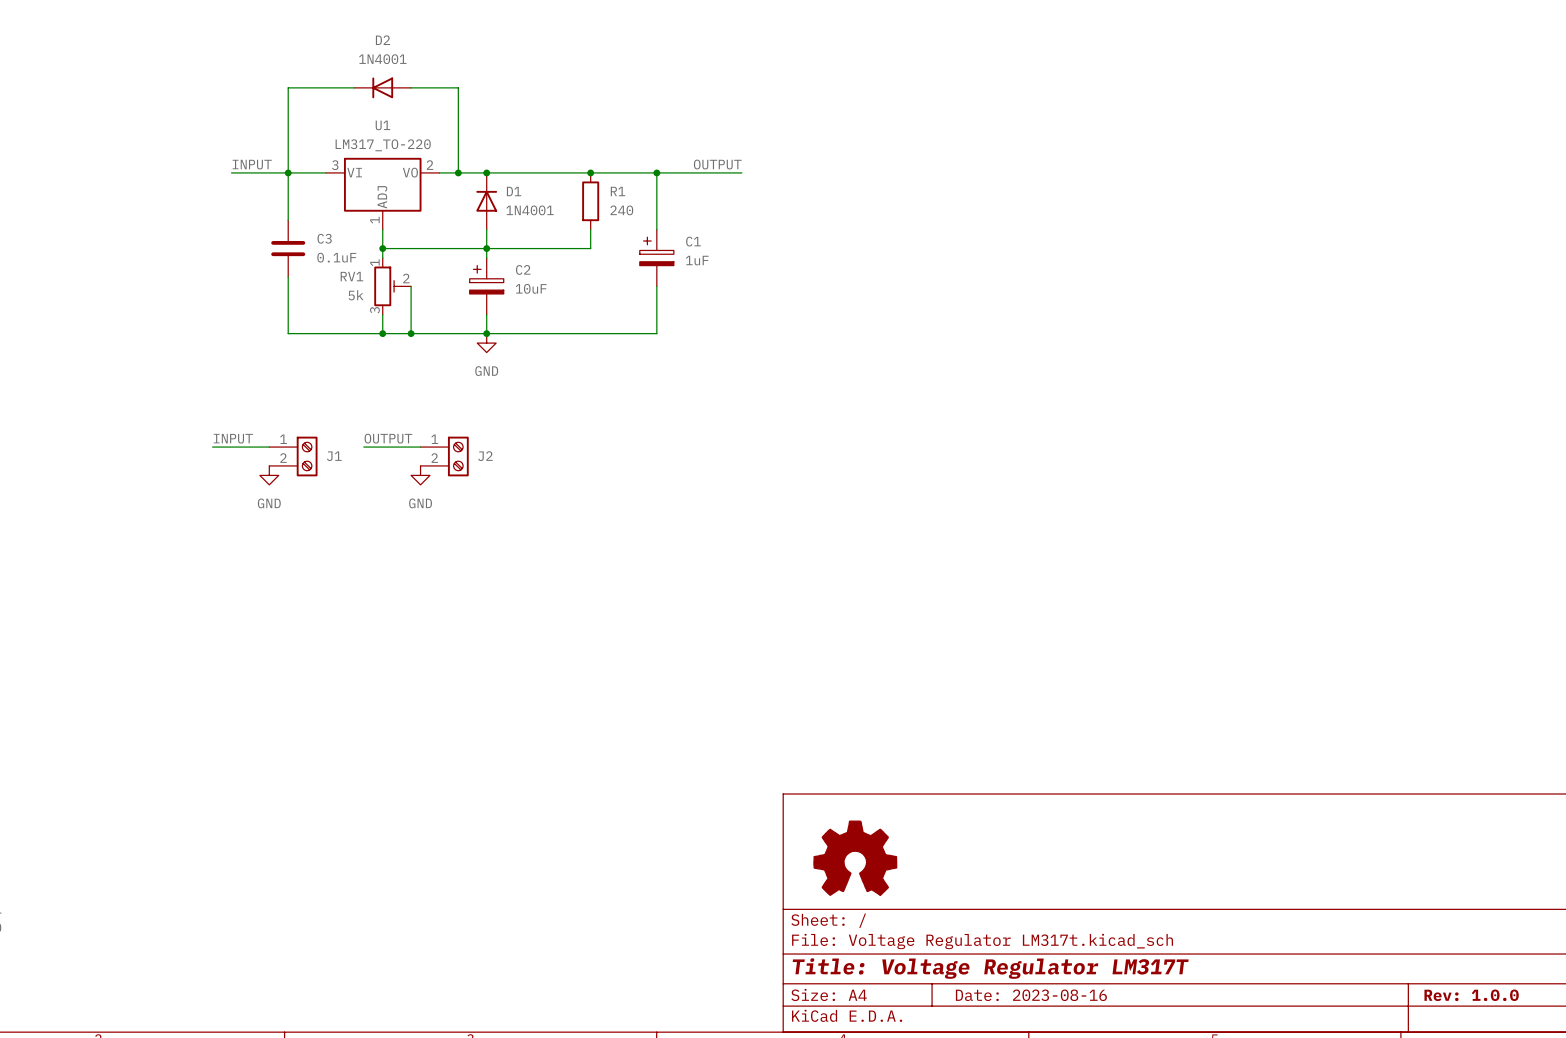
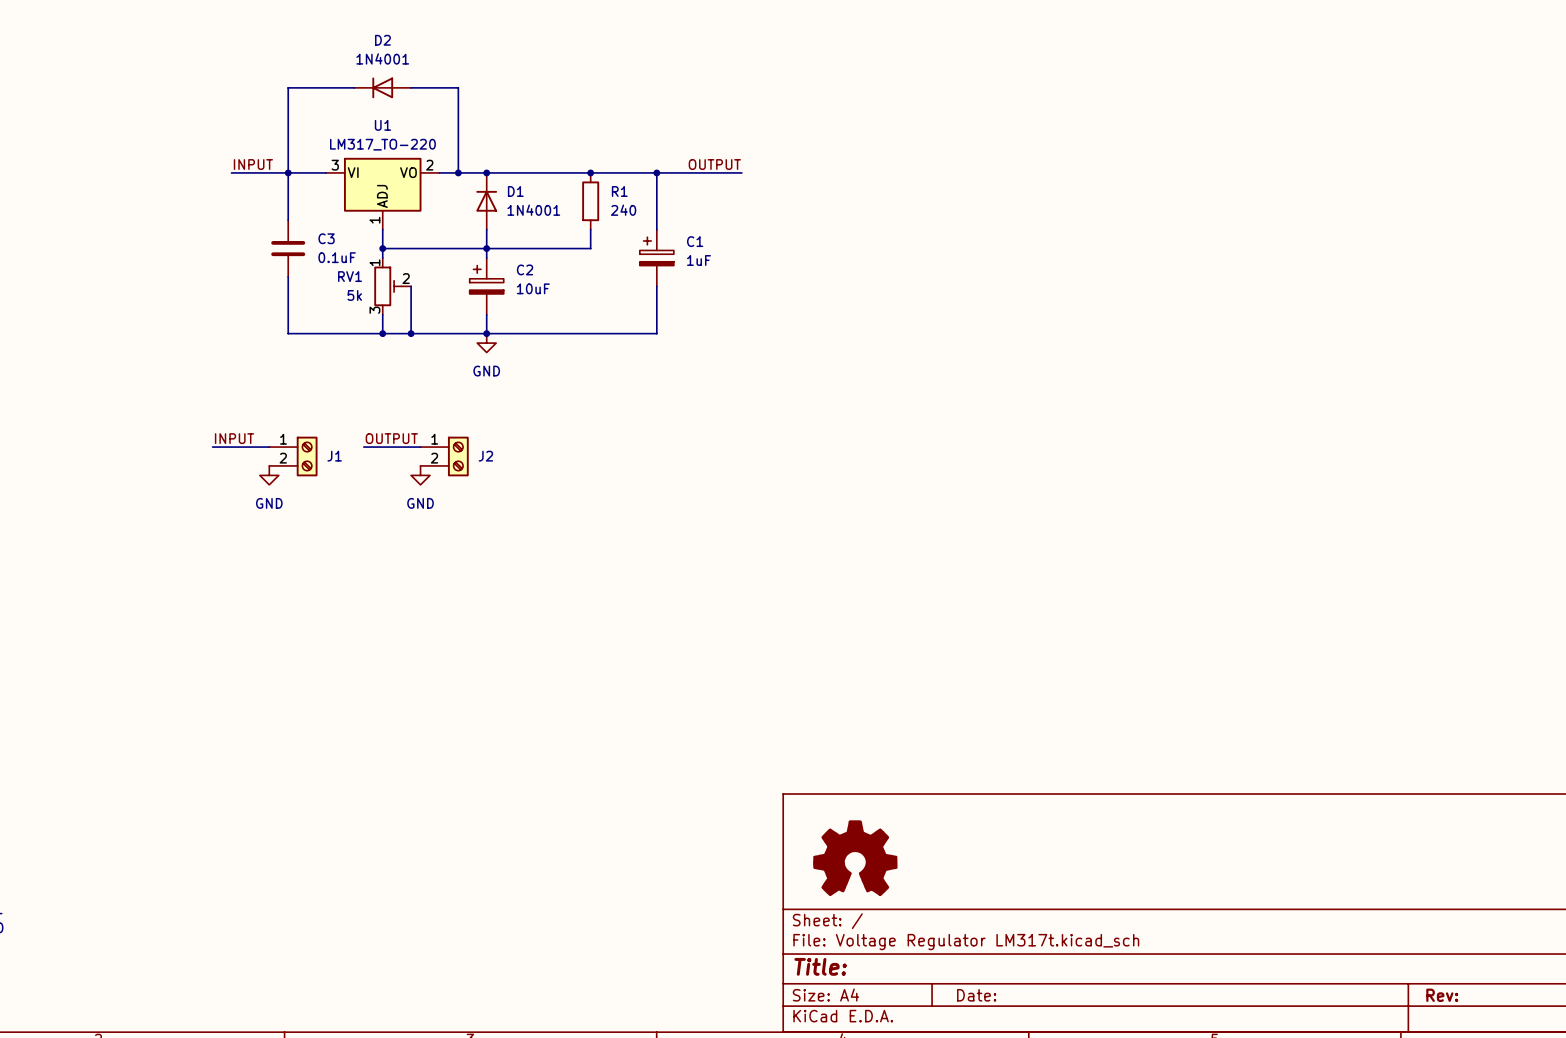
title block: Title: Voltage Regulator LM317T (990, 968) -> Title: (820, 966)
title block: Date: 2023-08-16 (1031, 995) -> Date: (976, 995)
title block: Rev: 1.0.0 (1471, 995) -> Rev: (1442, 995)

